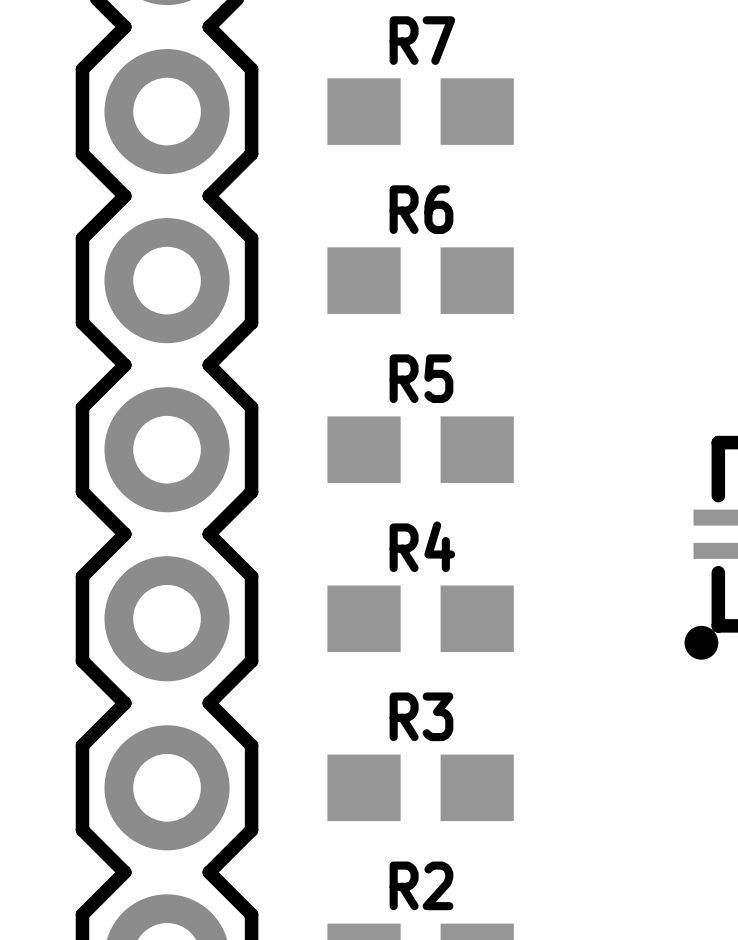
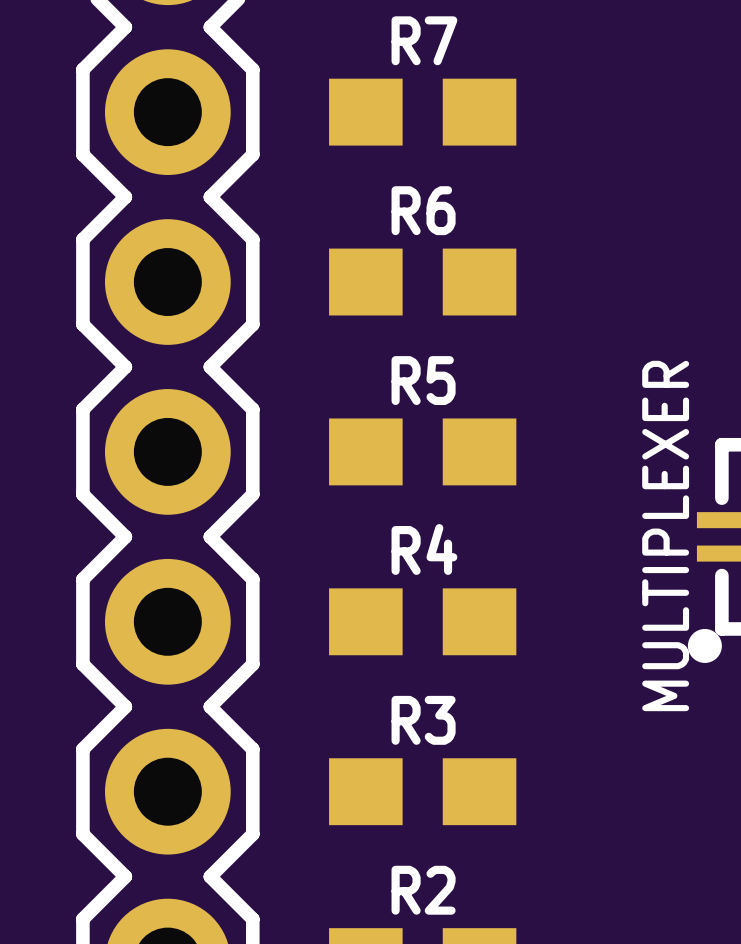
MULTIPLEXER name: none -> MULTIPLEXER (665, 535)

